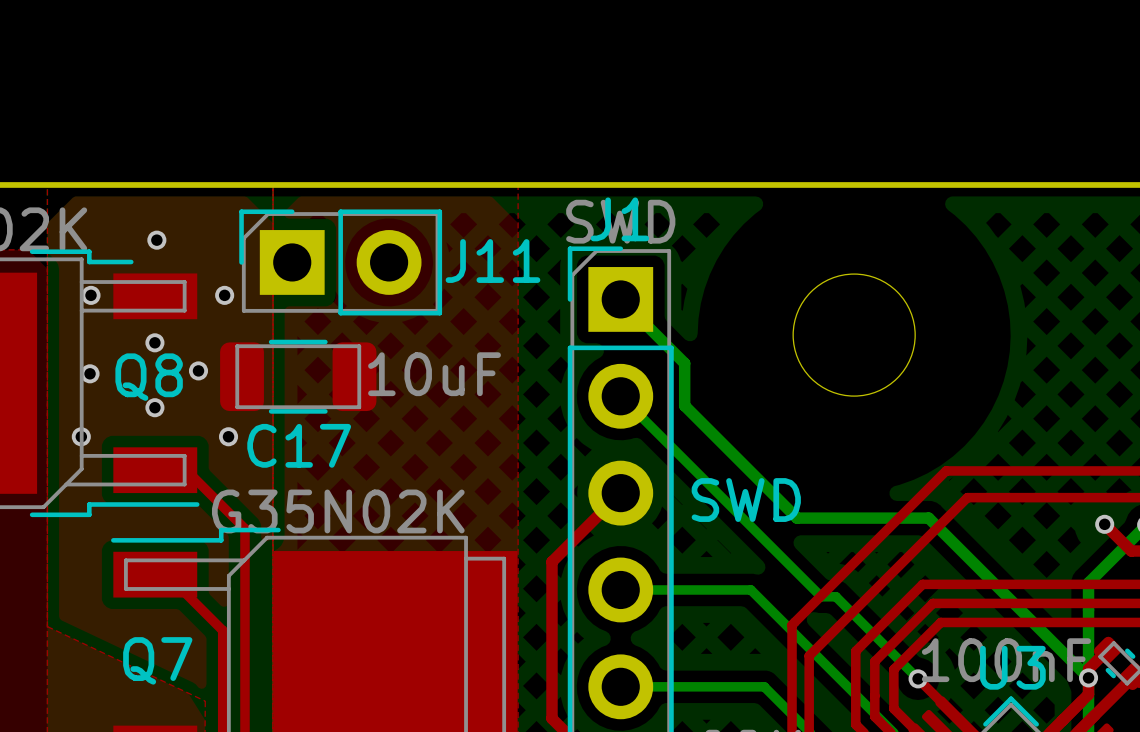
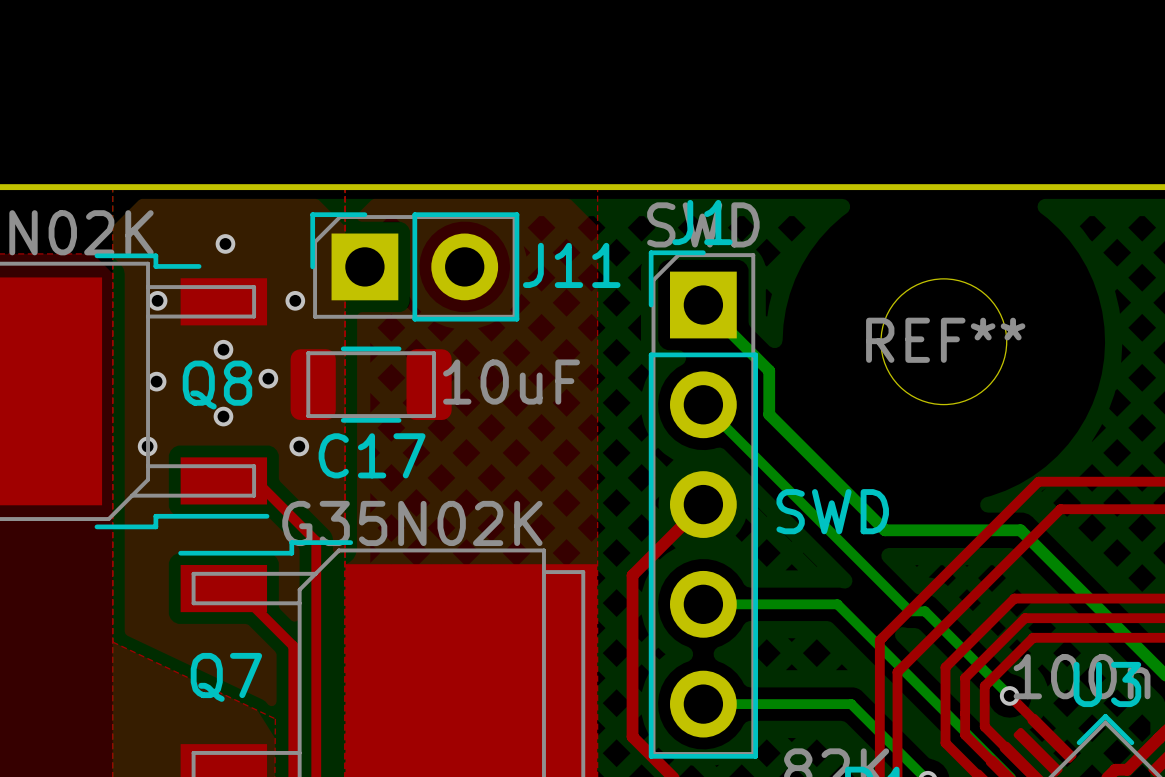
REF** name: none -> REF** (945, 340)

